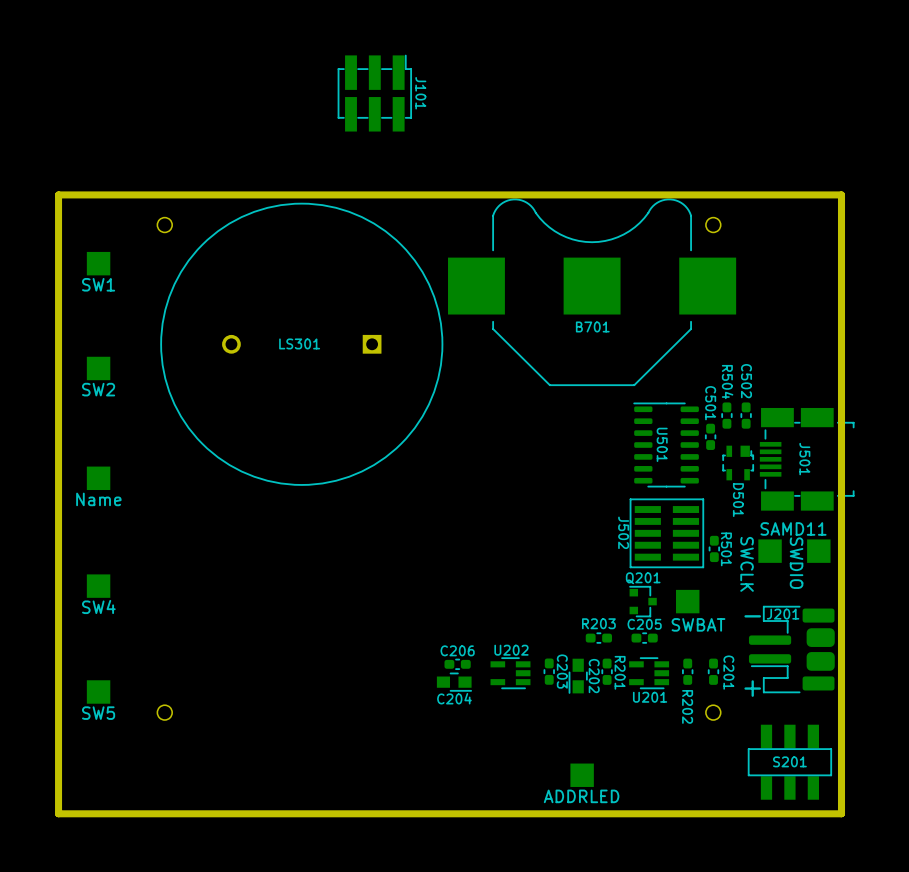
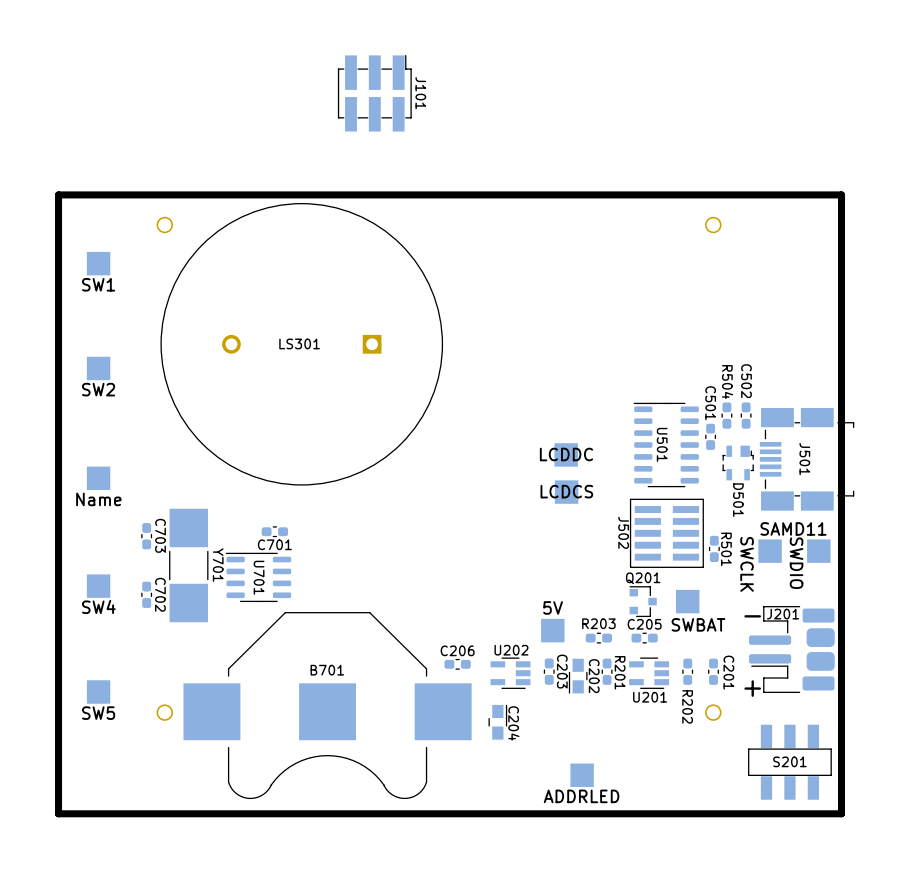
B701 rotation: 0° (592, 292) -> 180° (327, 705)
B701 position: (592, 292) -> (327, 705)
part: none -> (566, 454)
part: none -> (566, 492)
C701: none -> (274, 531)
C703: none -> (146, 536)
Y701: none -> (188, 565)
U701: none -> (258, 577)
C702: none -> (146, 594)
part: none -> (552, 630)
C204 rotation: 0° (454, 682) -> 90° counterclockwise (497, 722)
C204 position: (454, 682) -> (497, 722)

